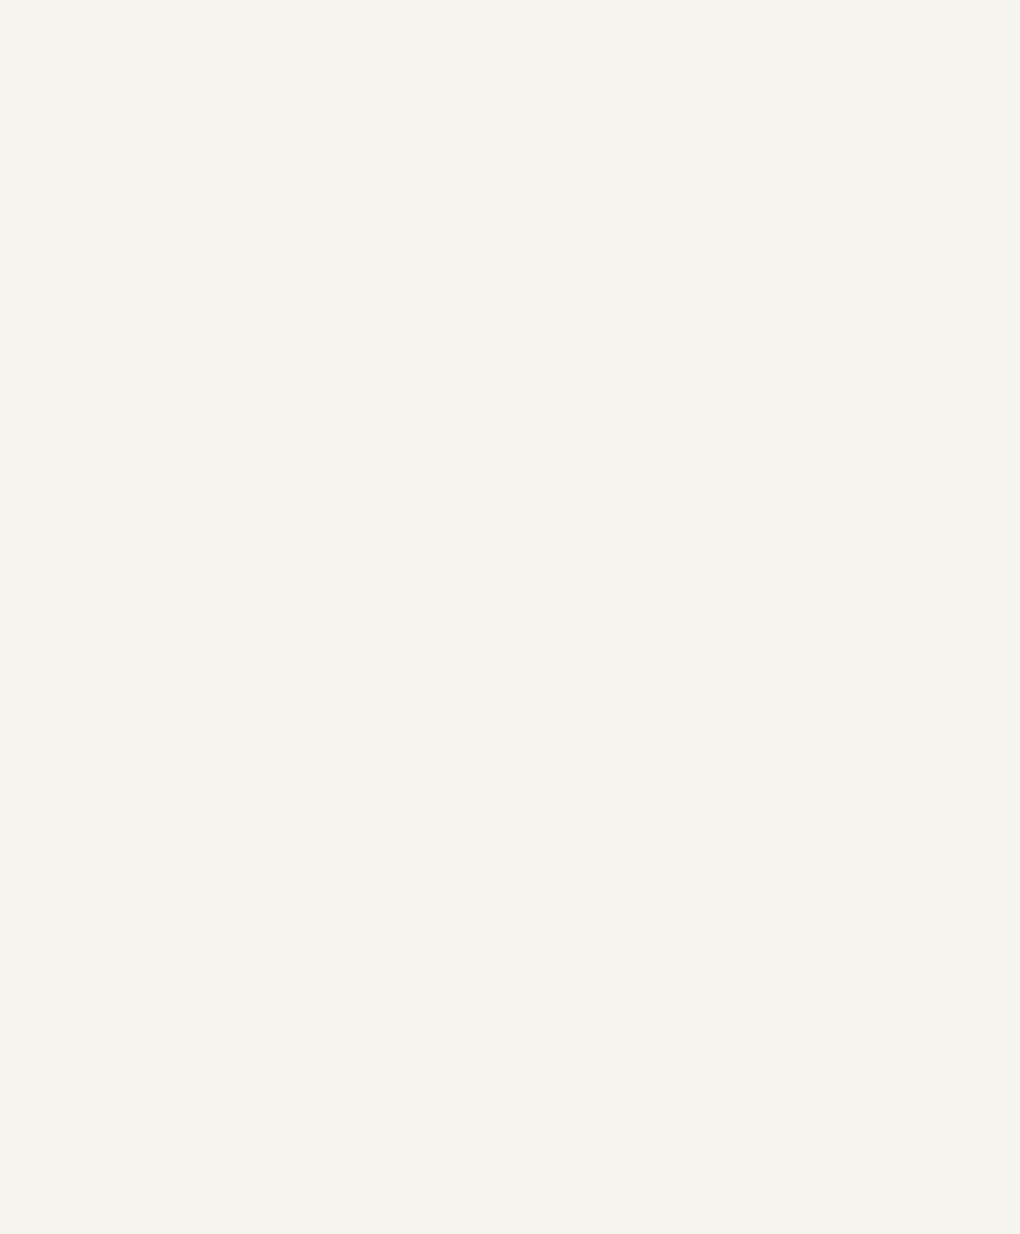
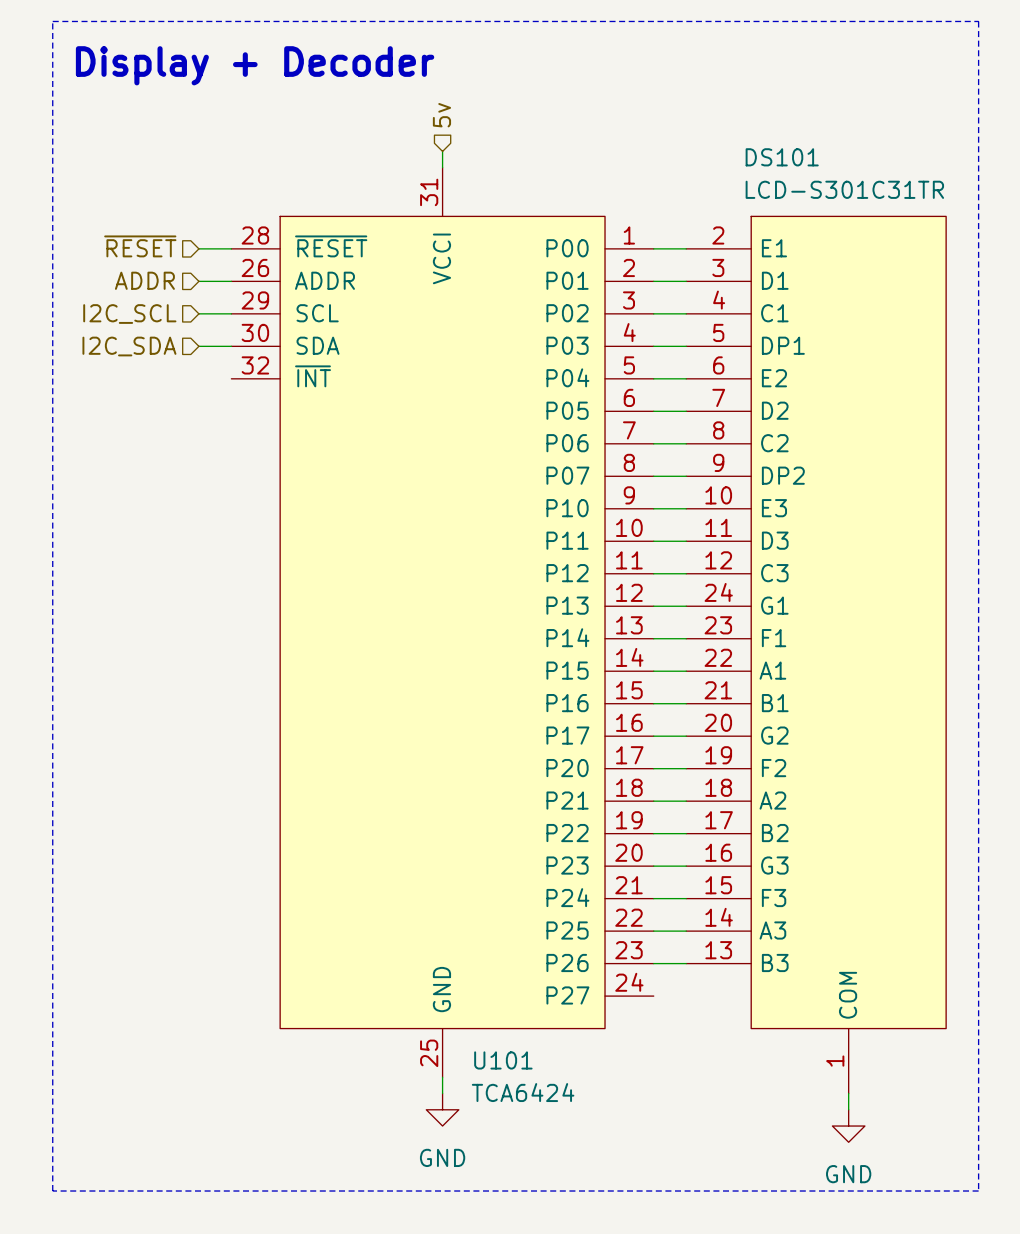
line: none -> (52, 21) (978, 21) (978, 1191) (52, 1191) (52, 21)
text: none -> Display + Decoder (255, 65)
hierarchical label: none -> 5v (441, 115)
wire: none -> (442, 151) (442, 167)
hierarchical label: none -> ~{RESET} (140, 246)
wire: none -> (198, 248) (231, 248)
wire: none -> (653, 248) (686, 248)
hierarchical label: none -> ADDR (144, 280)
wire: none -> (198, 281) (231, 281)
wire: none -> (653, 281) (686, 281)
wire: none -> (198, 313) (231, 313)
wire: none -> (653, 313) (686, 313)
hierarchical label: none -> I2C_SCL (129, 314)
hierarchical label: none -> I2C_SDA (129, 346)
wire: none -> (198, 346) (231, 346)
wire: none -> (653, 346) (686, 346)
wire: none -> (653, 378) (686, 378)
wire: none -> (653, 411) (686, 411)
wire: none -> (653, 443) (686, 443)
wire: none -> (653, 476) (686, 476)
wire: none -> (653, 508) (686, 508)
wire: none -> (653, 541) (686, 541)
wire: none -> (653, 573) (686, 573)
wire: none -> (653, 606) (686, 606)
U101: none -> TCA6424 (442, 622)
wire: none -> (653, 638) (686, 638)
DS101: none -> LCD-S301C31TR (816, 654)
wire: none -> (653, 671) (686, 671)
wire: none -> (653, 703) (686, 703)
wire: none -> (653, 736) (686, 736)
wire: none -> (653, 768) (686, 768)
wire: none -> (653, 801) (686, 801)
wire: none -> (653, 833) (686, 833)
wire: none -> (653, 866) (686, 866)
wire: none -> (653, 898) (686, 898)
wire: none -> (653, 931) (686, 931)
wire: none -> (653, 963) (686, 963)
wire: none -> (442, 1077) (442, 1093)
wire: none -> (848, 1093) (848, 1109)
power symbol: none -> GND (442, 1109)
power symbol: none -> GND (848, 1126)

